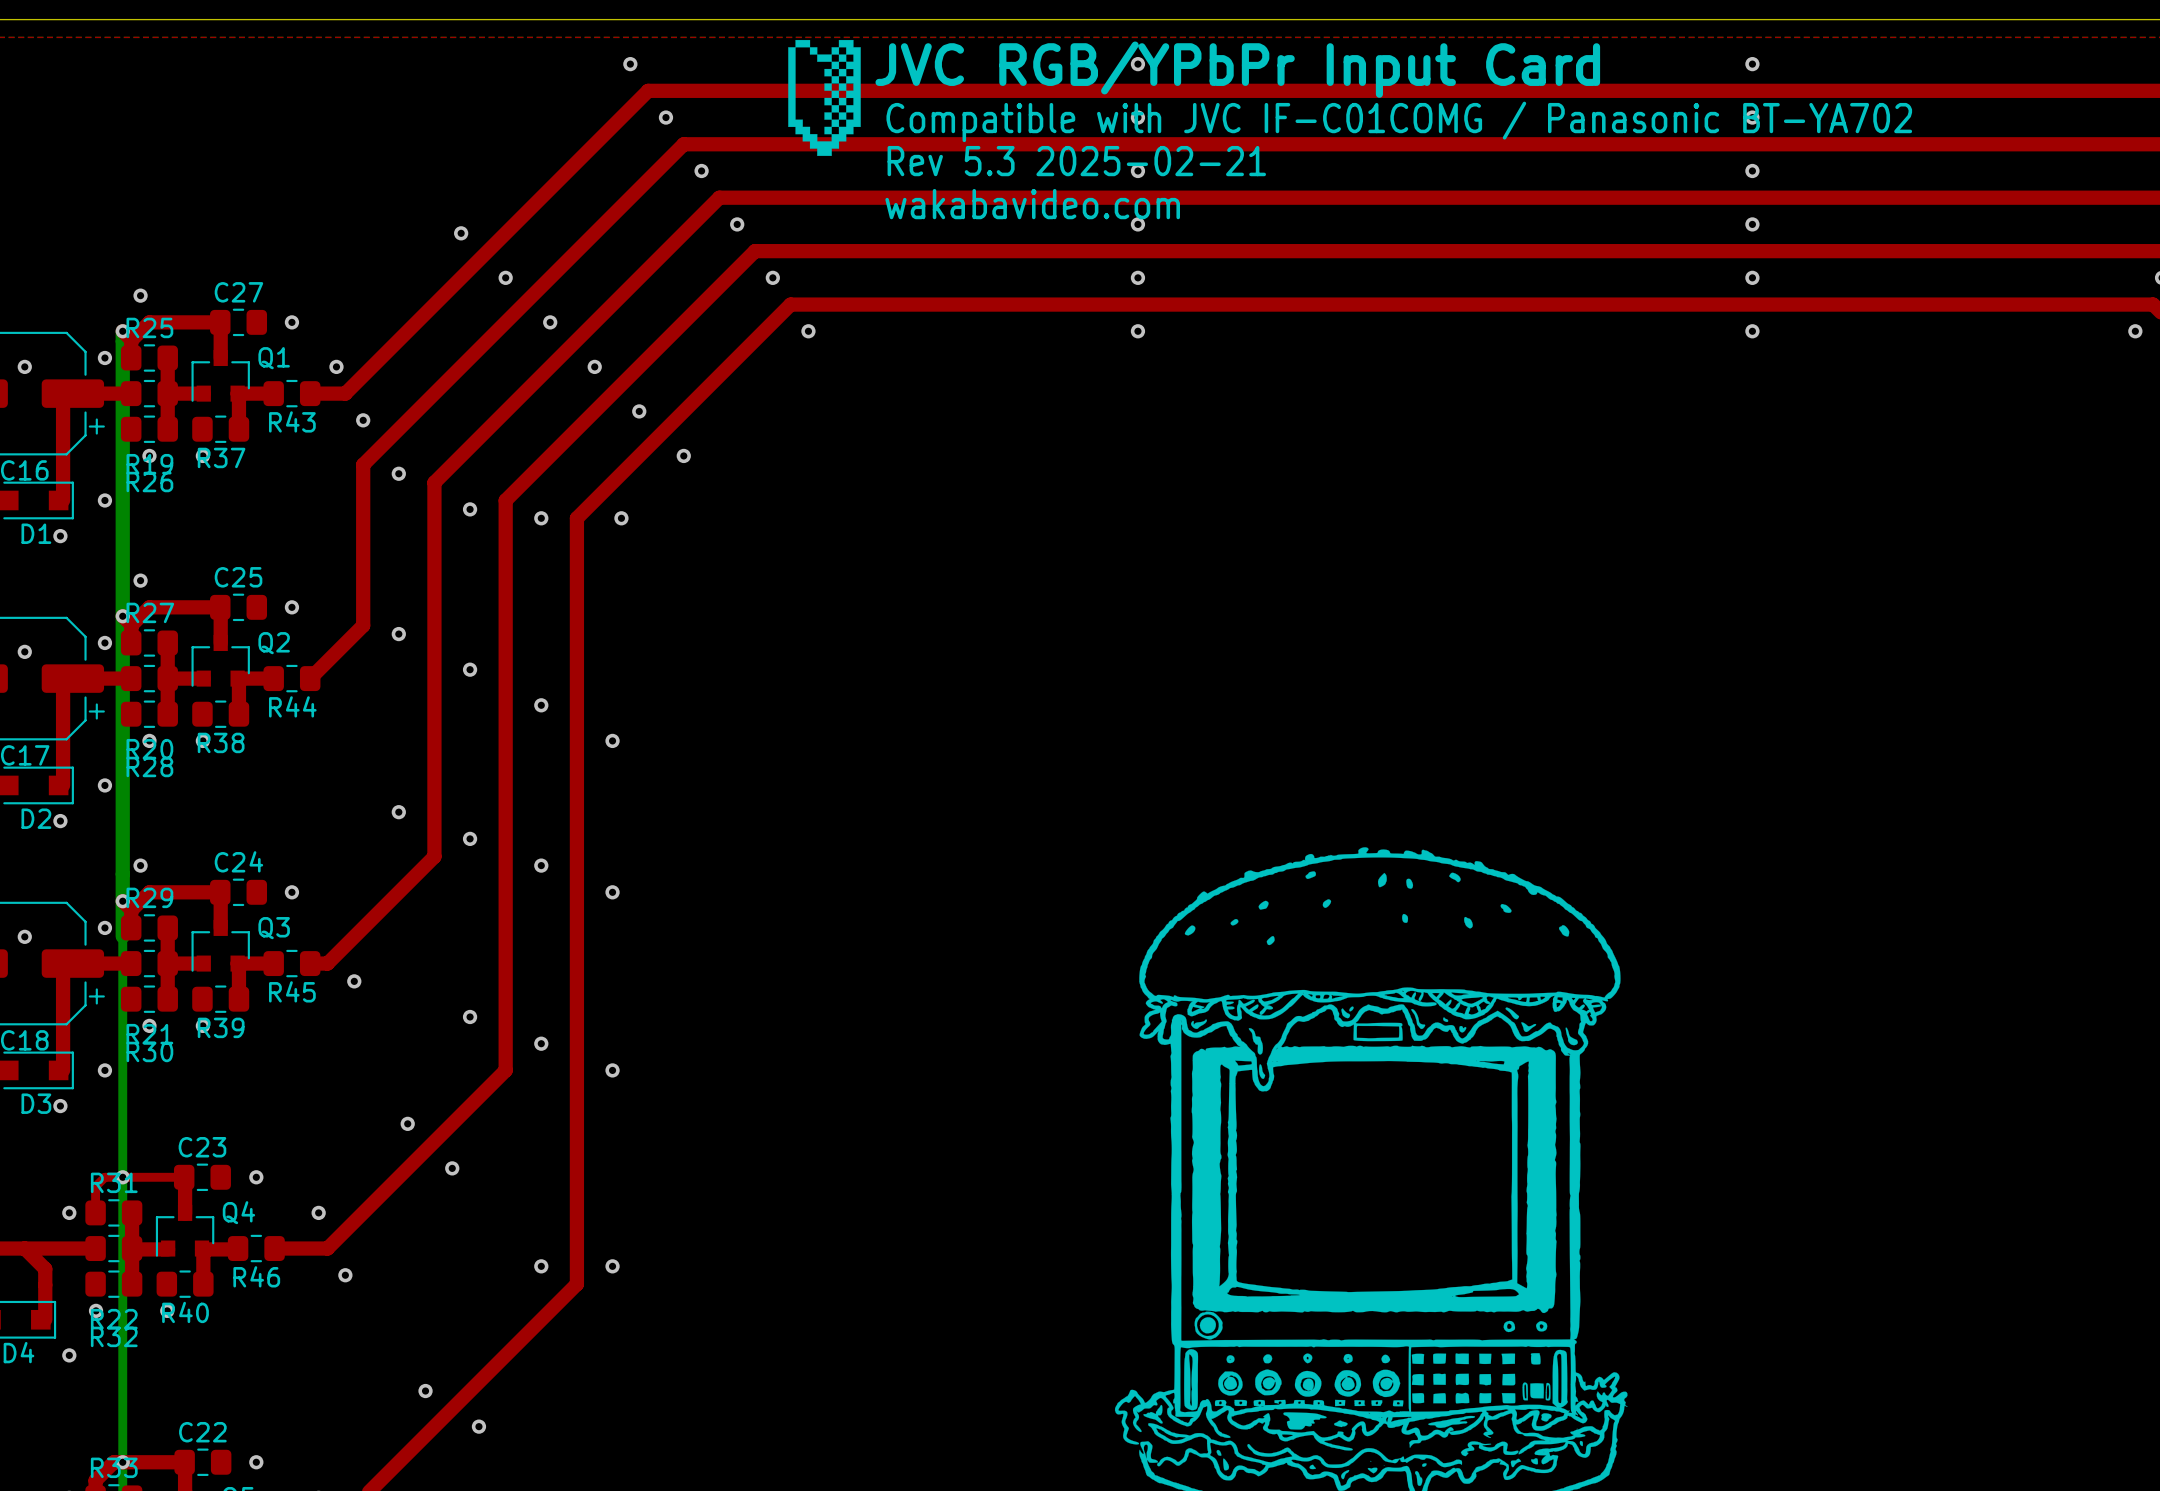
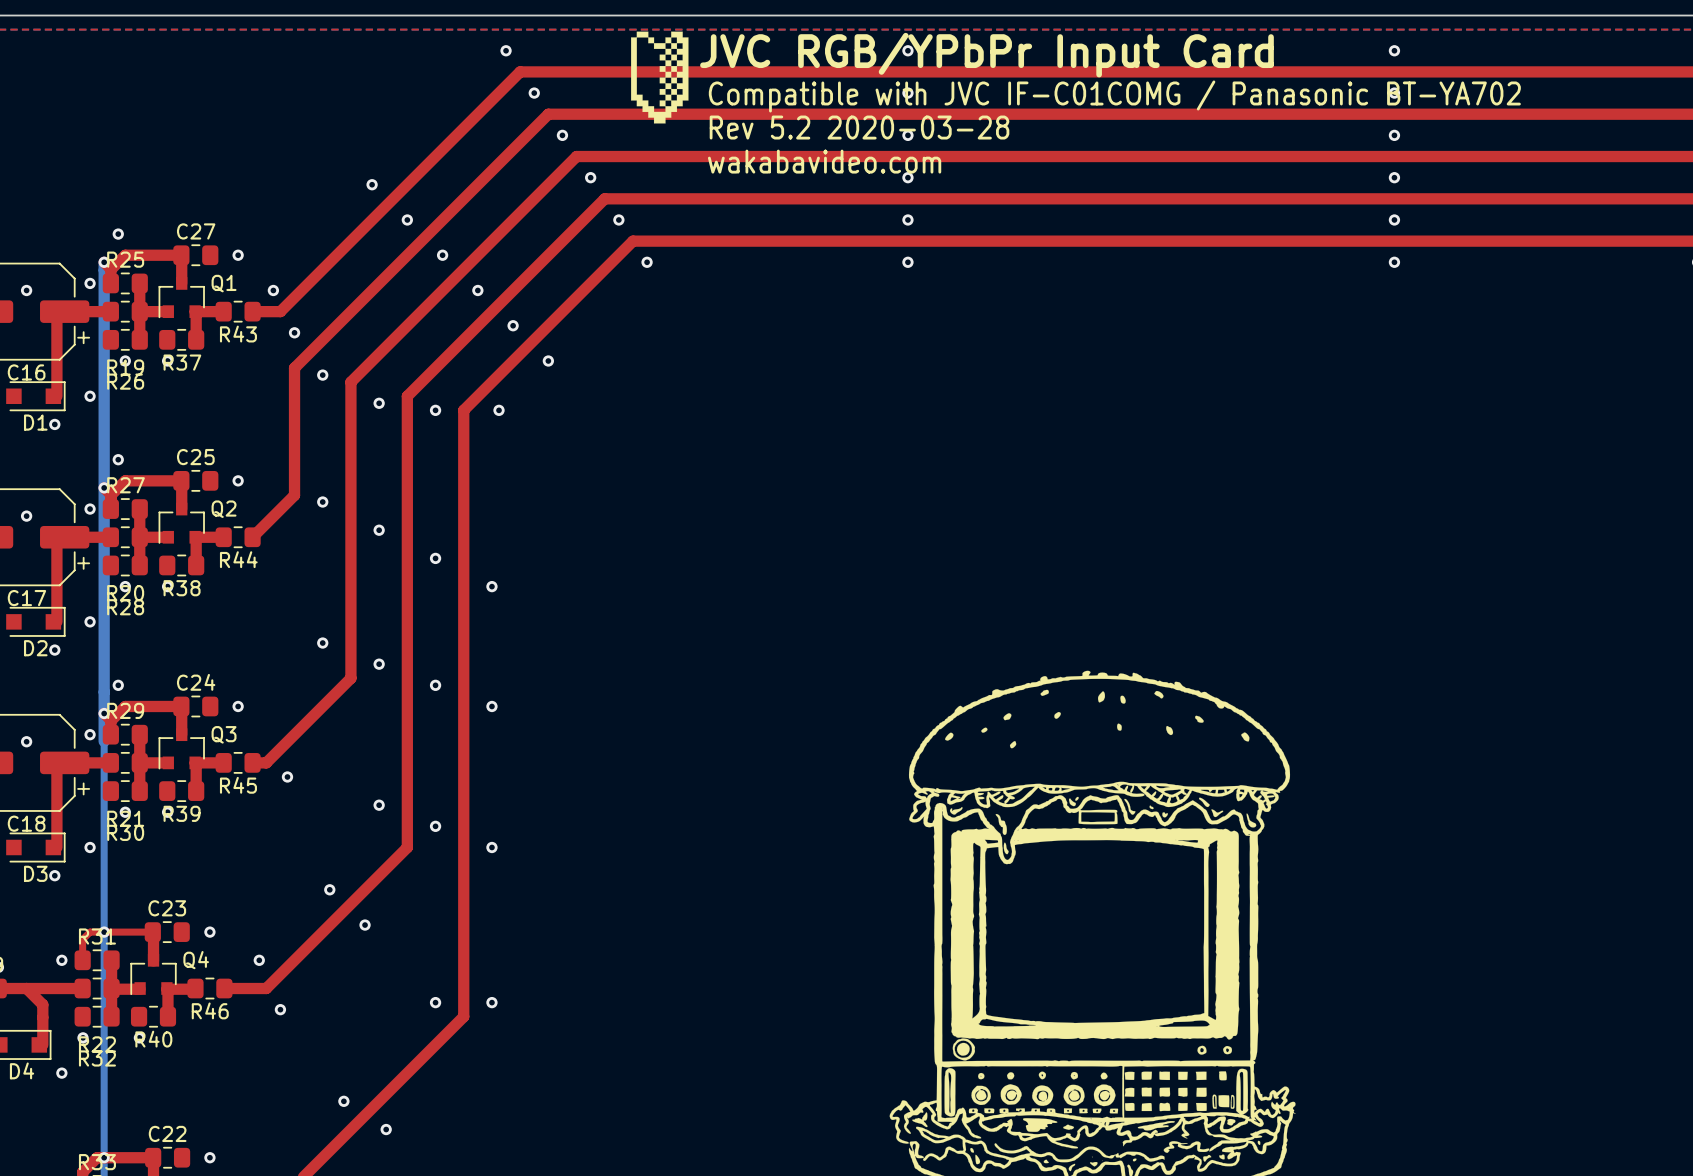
text: Rev 5.3 2025-02-21 (1076, 161) -> Rev 5.2 2020-03-28 (859, 127)

